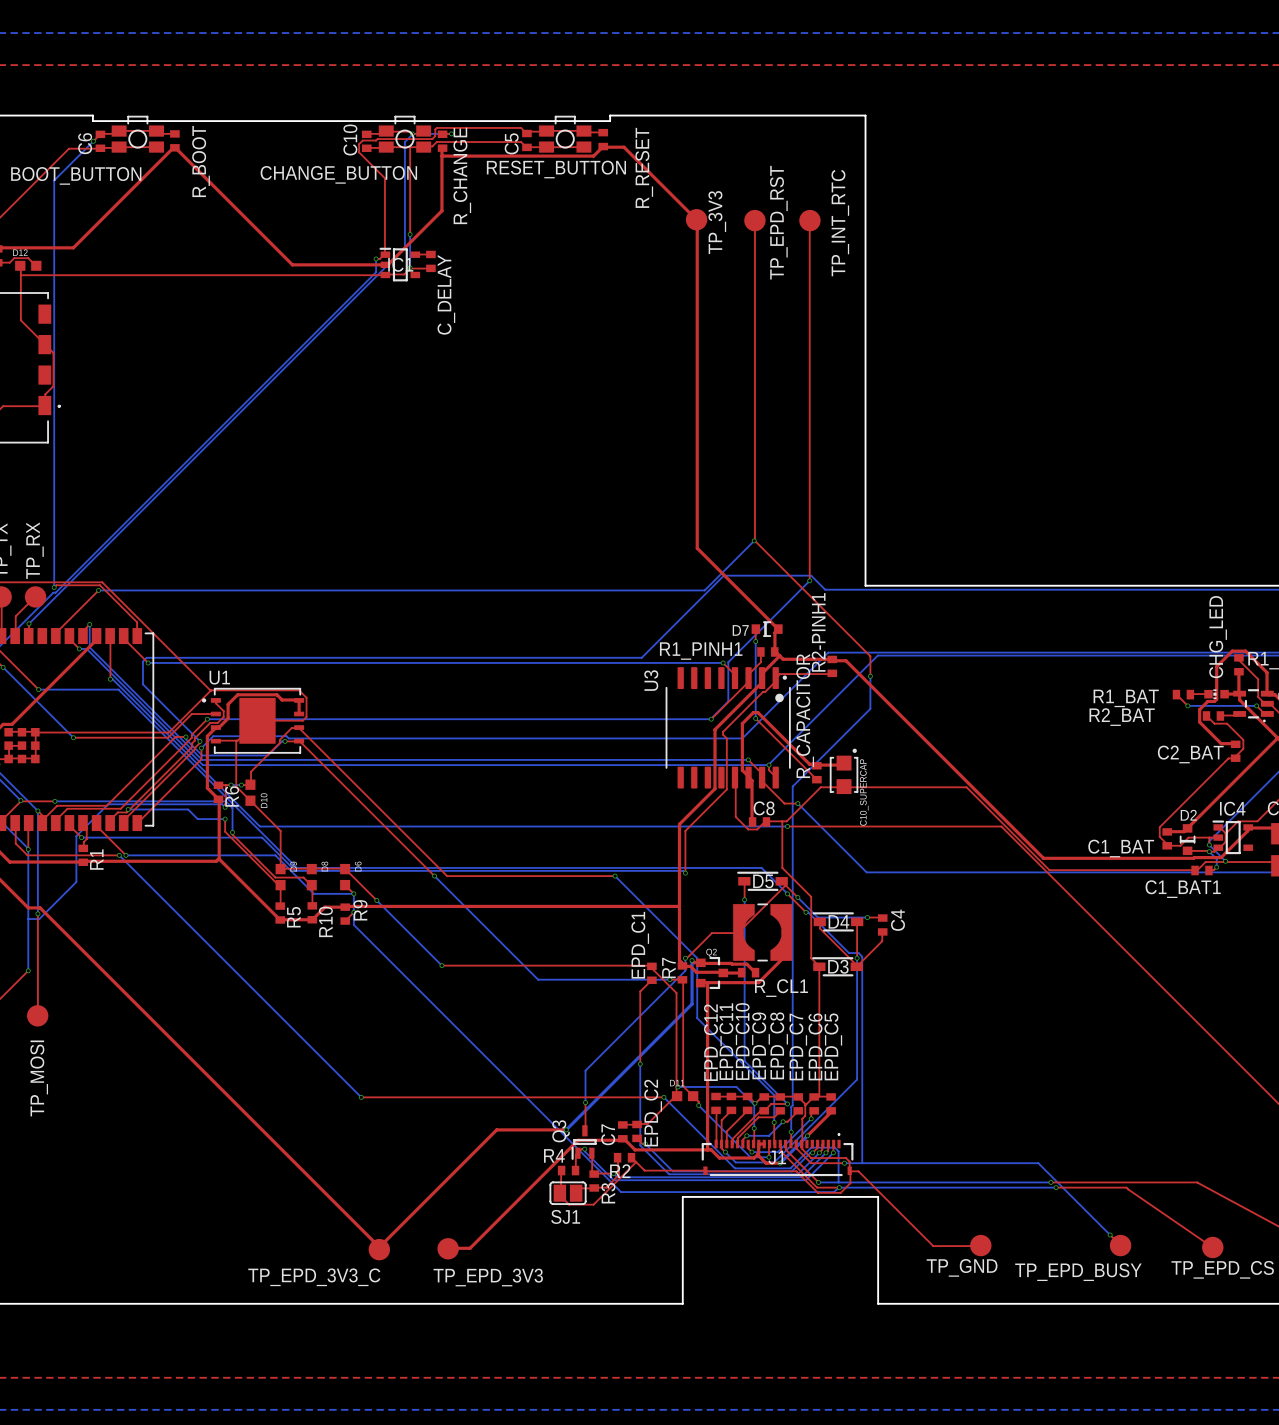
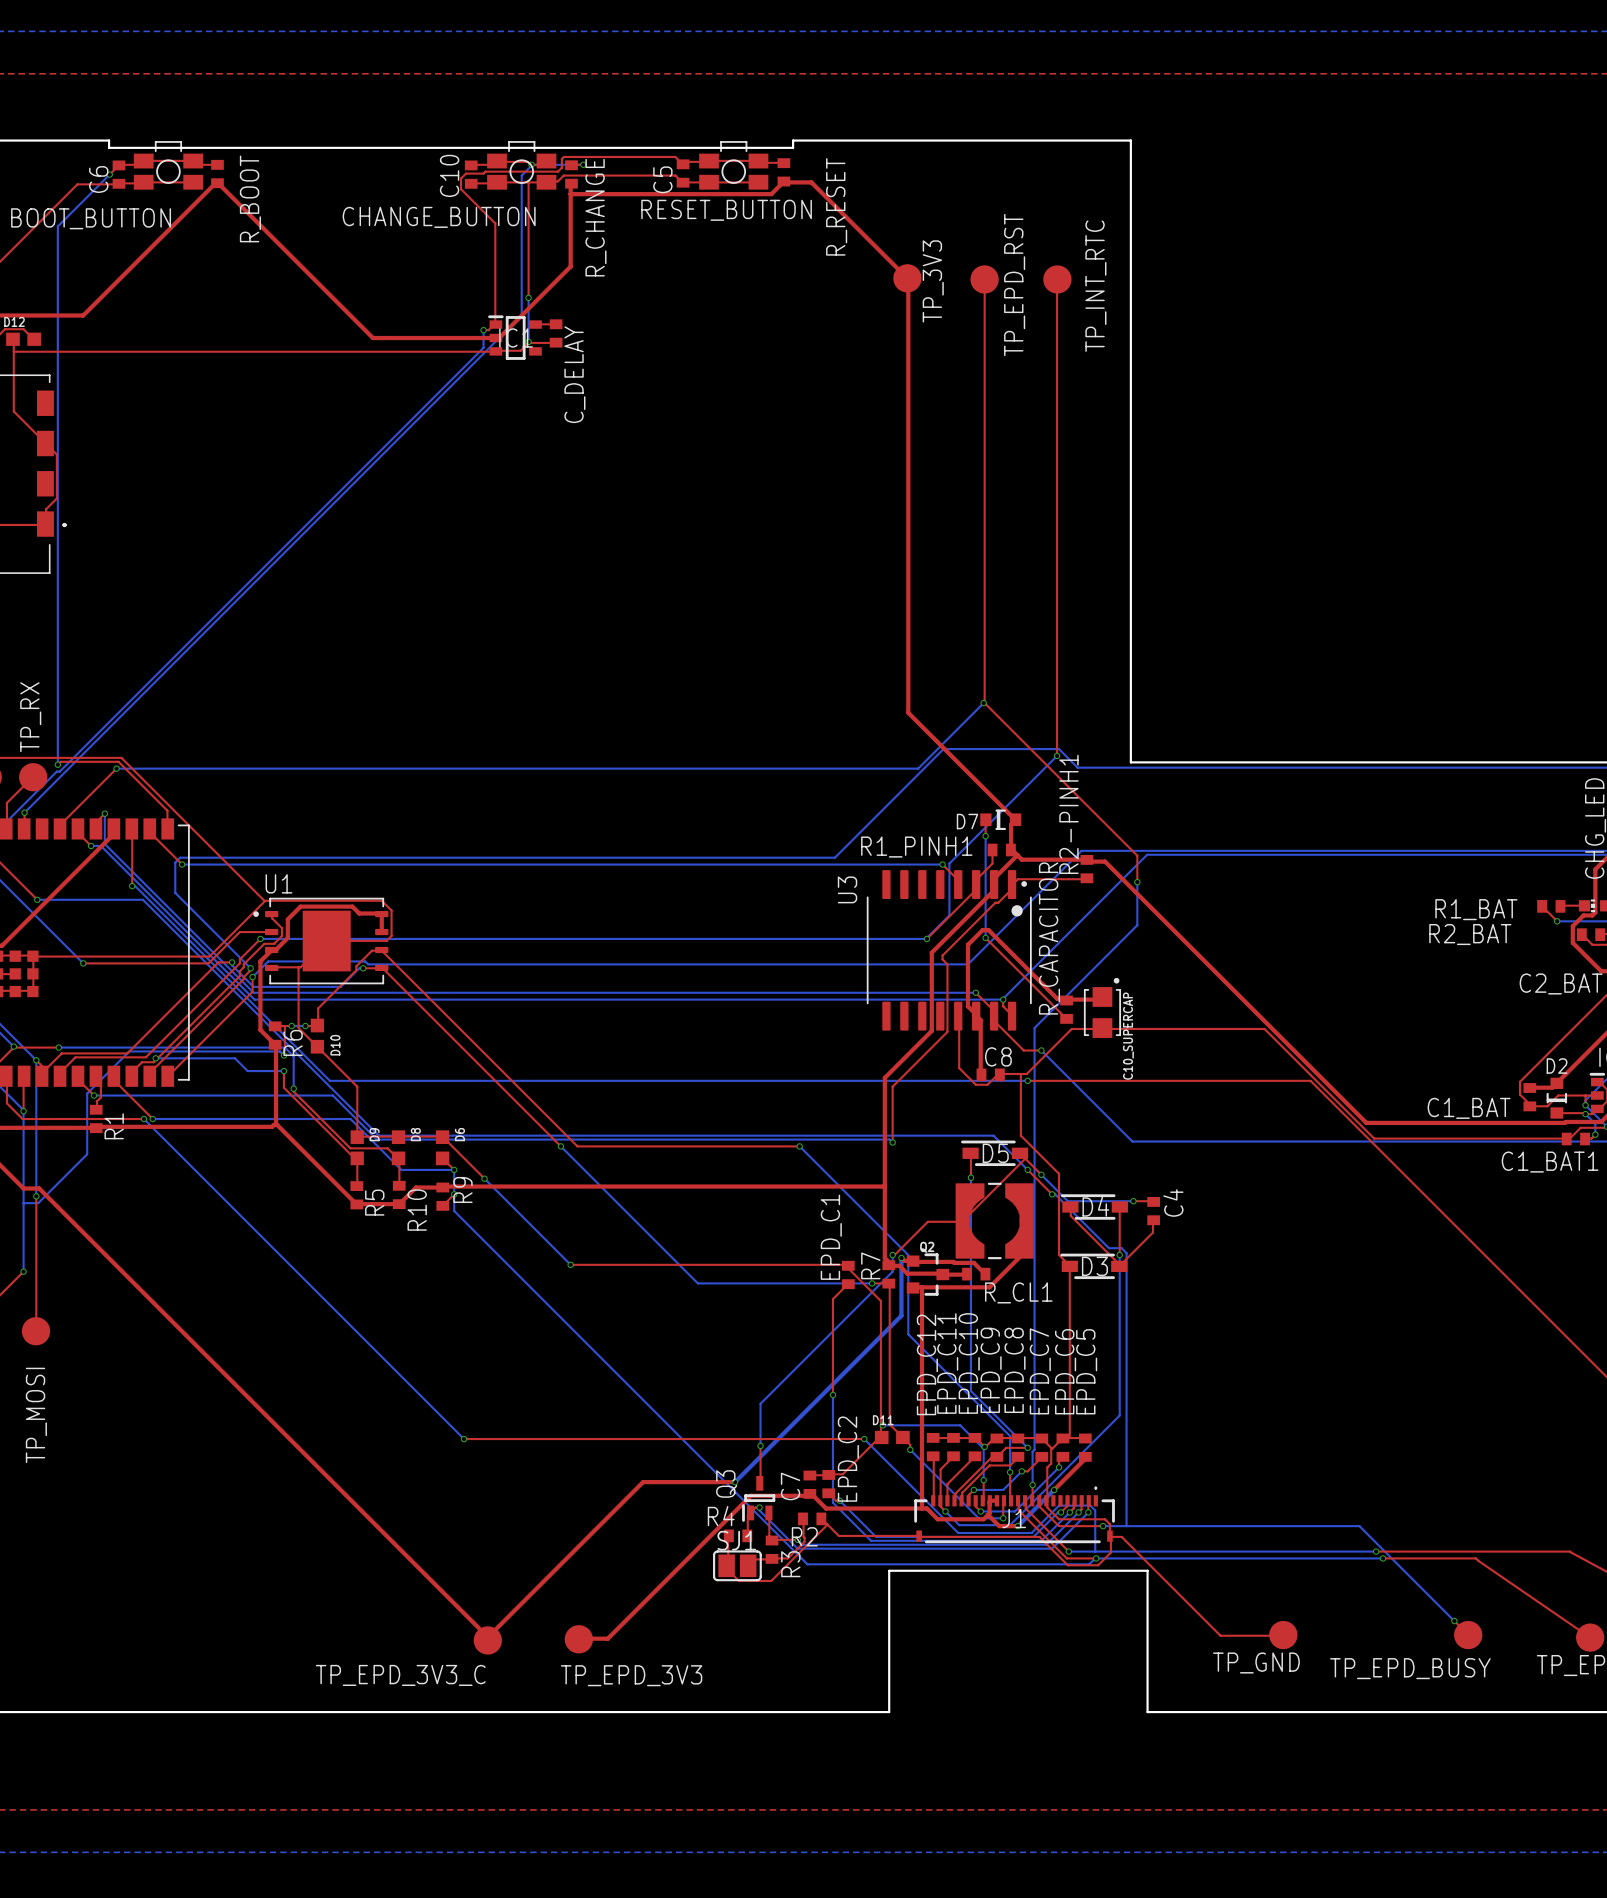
SJ1 name position: SJ1 (565, 1216) -> SJ1 (736, 1540)

